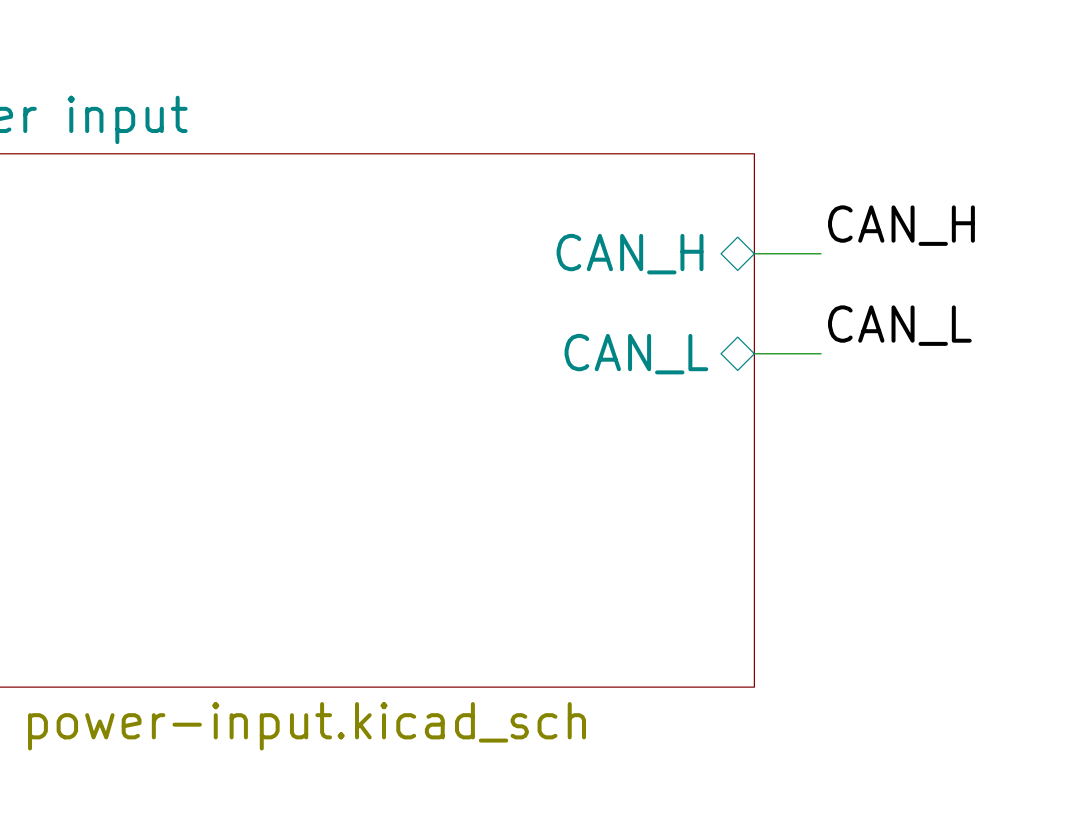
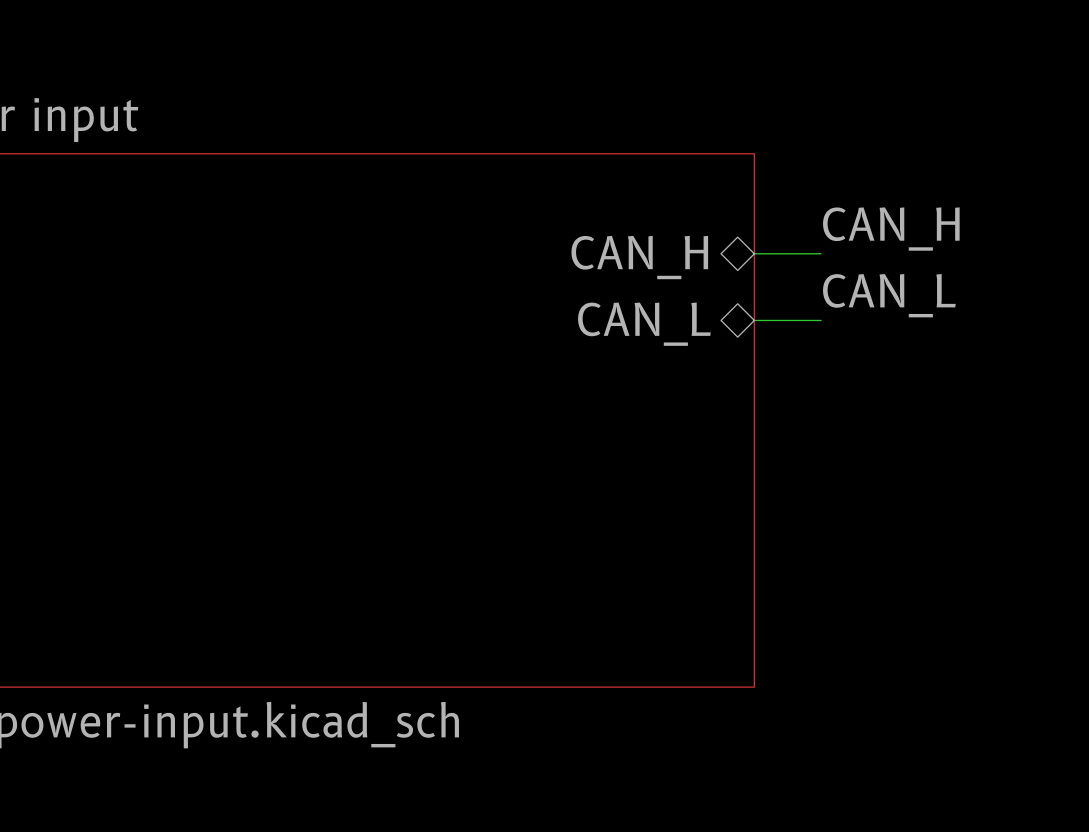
label position: CAN_L (899, 325) -> CAN_L (889, 295)
wire: (754, 353) (821, 353) -> (754, 320) (821, 320)
sheet pin position: CAN_L (636, 354) -> CAN_L (644, 324)

